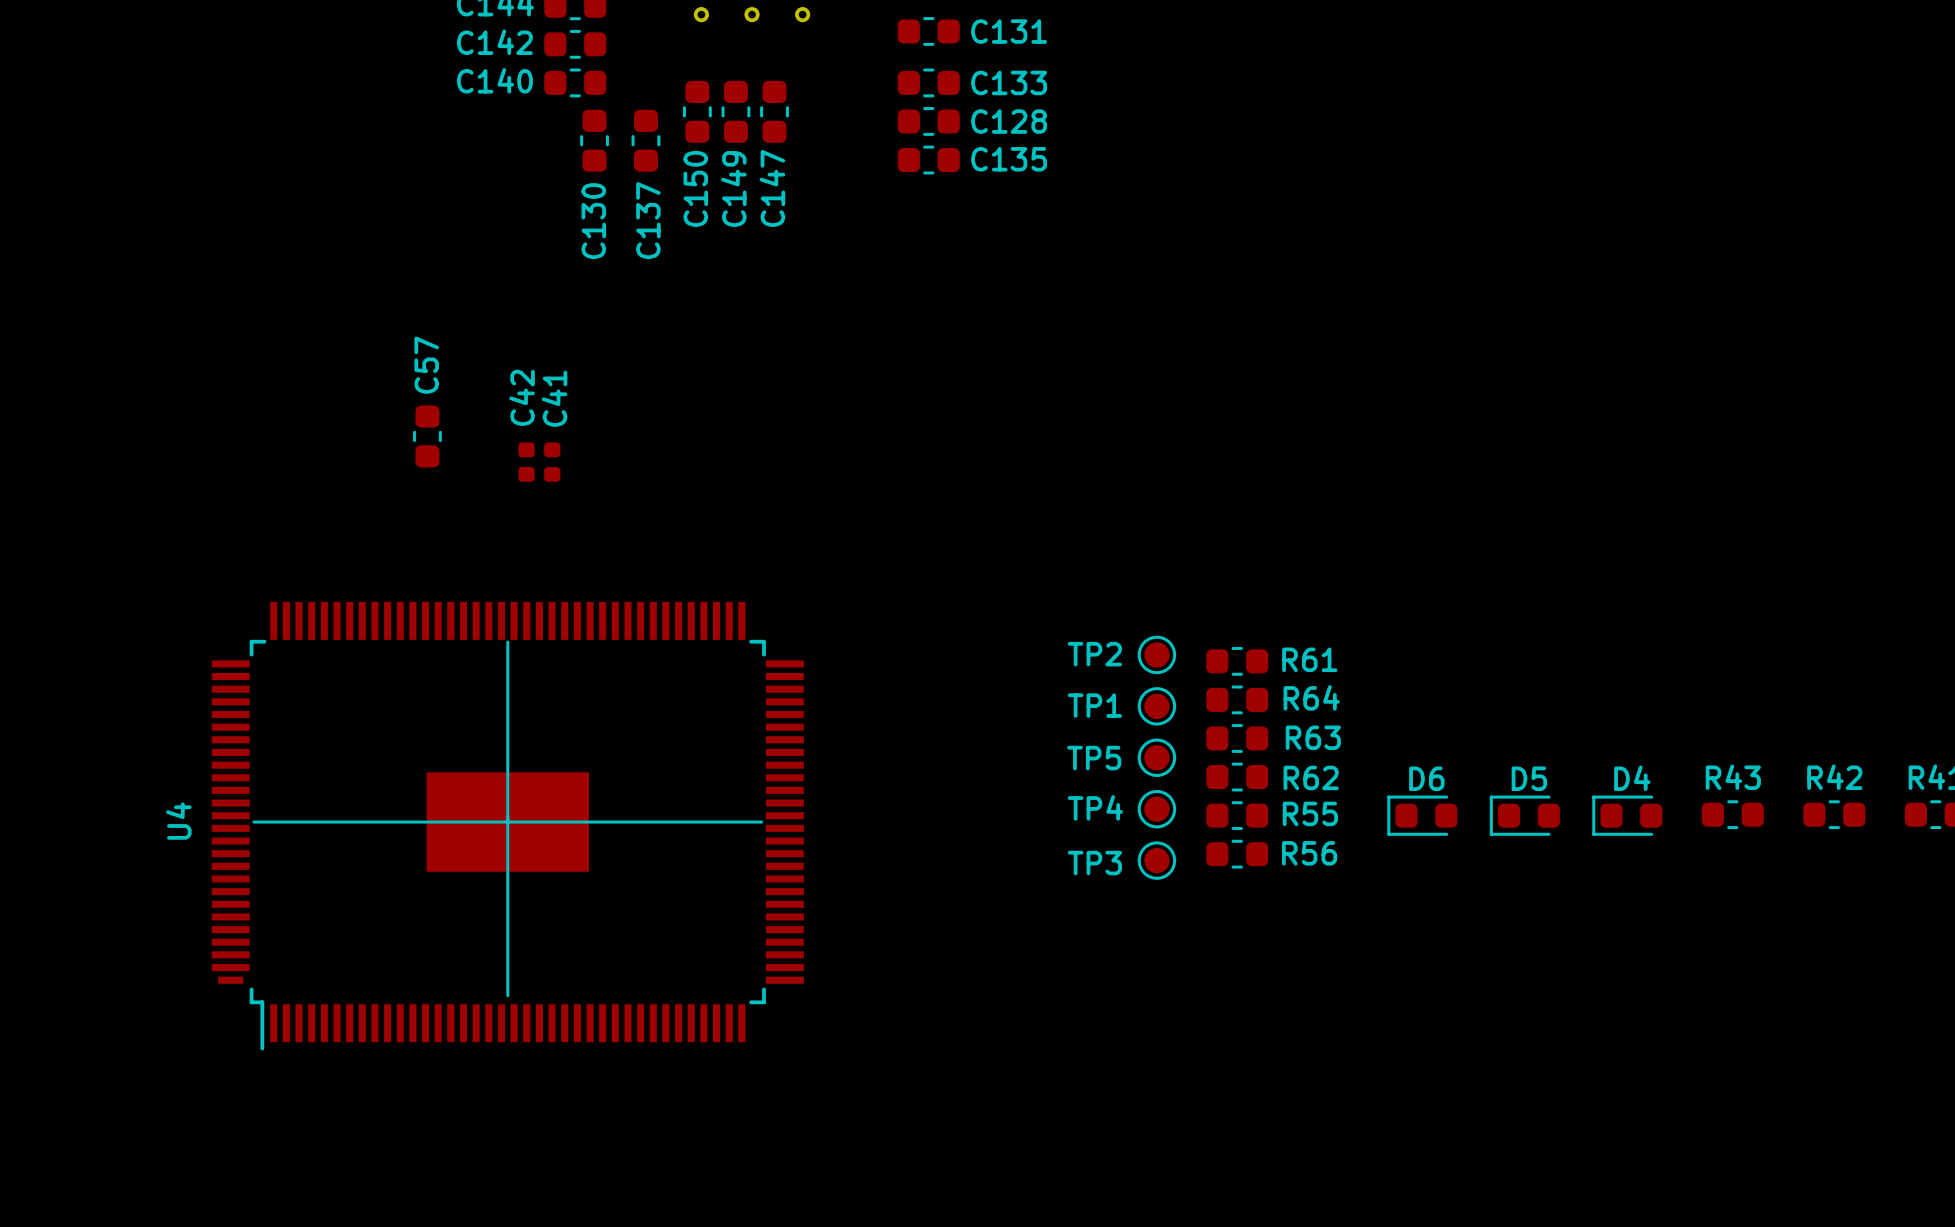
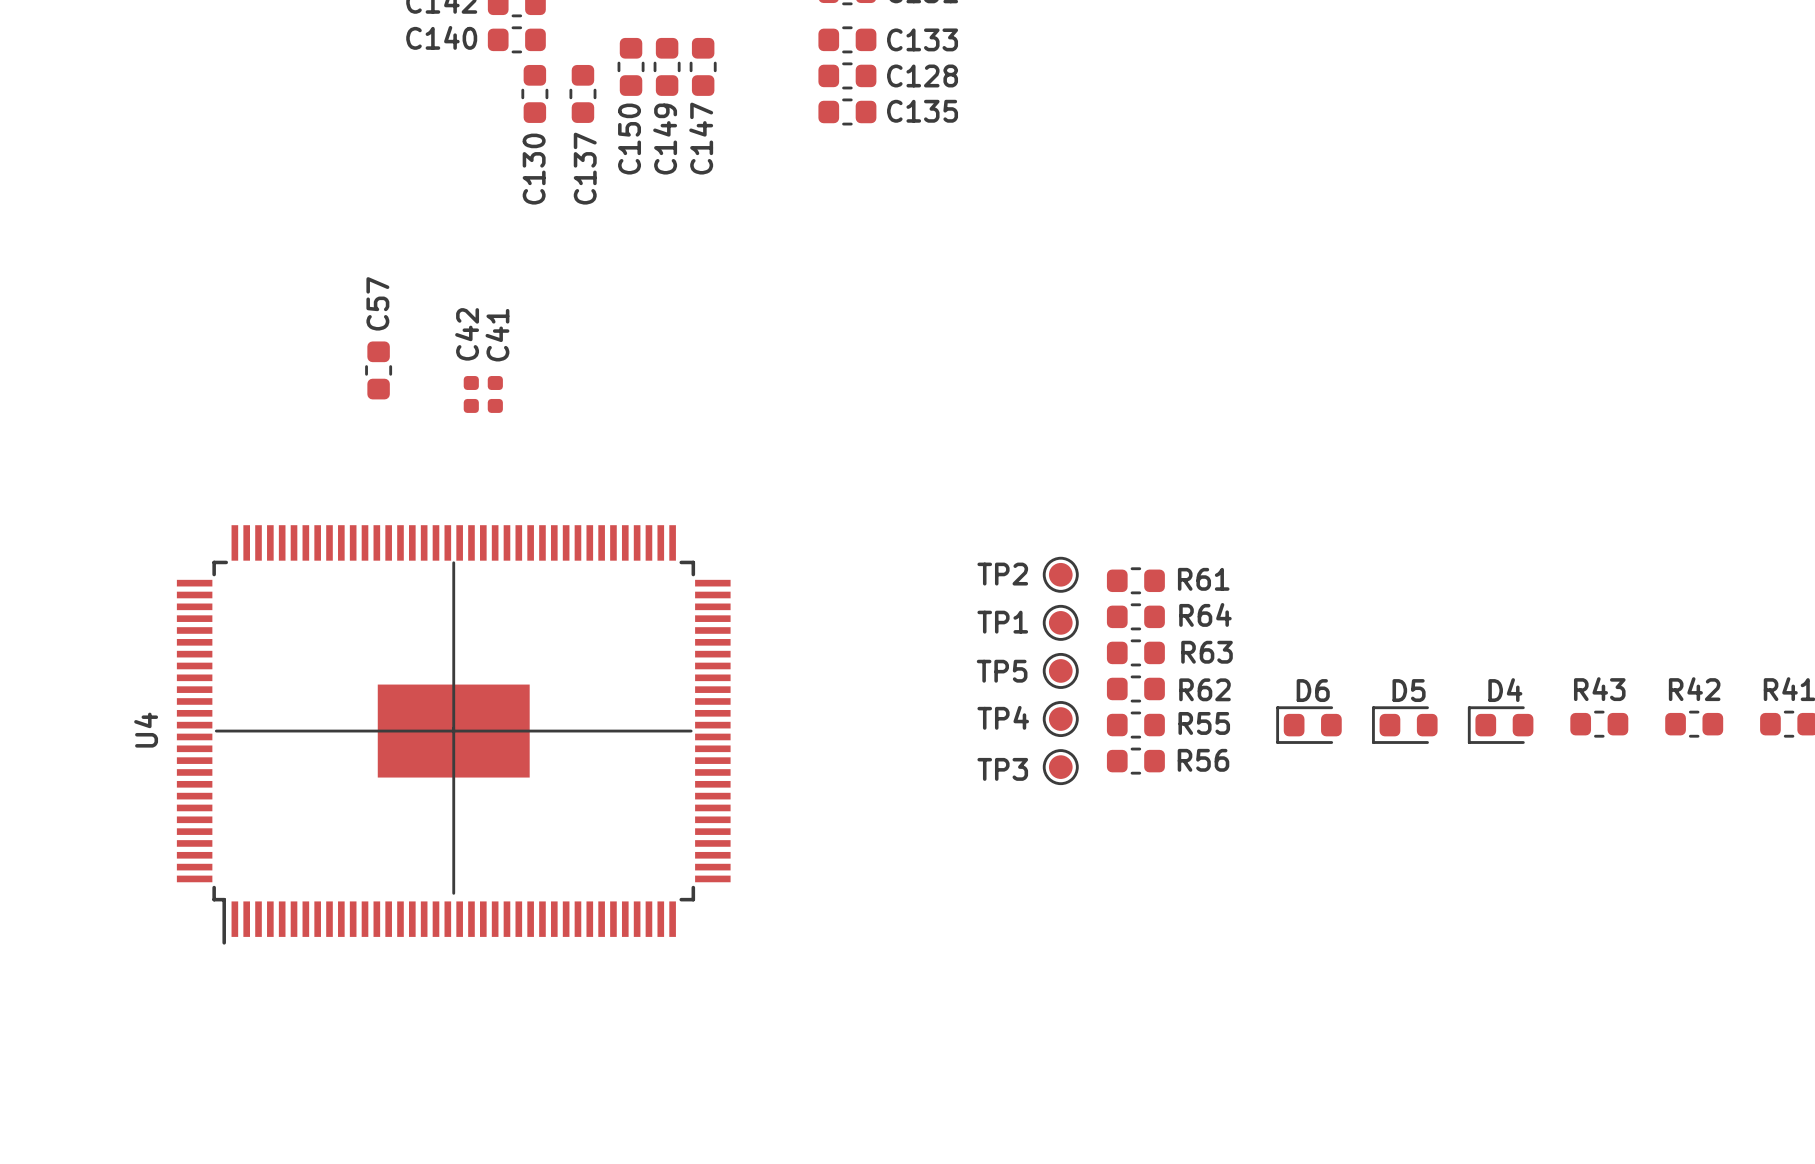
U4 footprint: [211, 601, 804, 1051] -> [176, 525, 731, 945]

